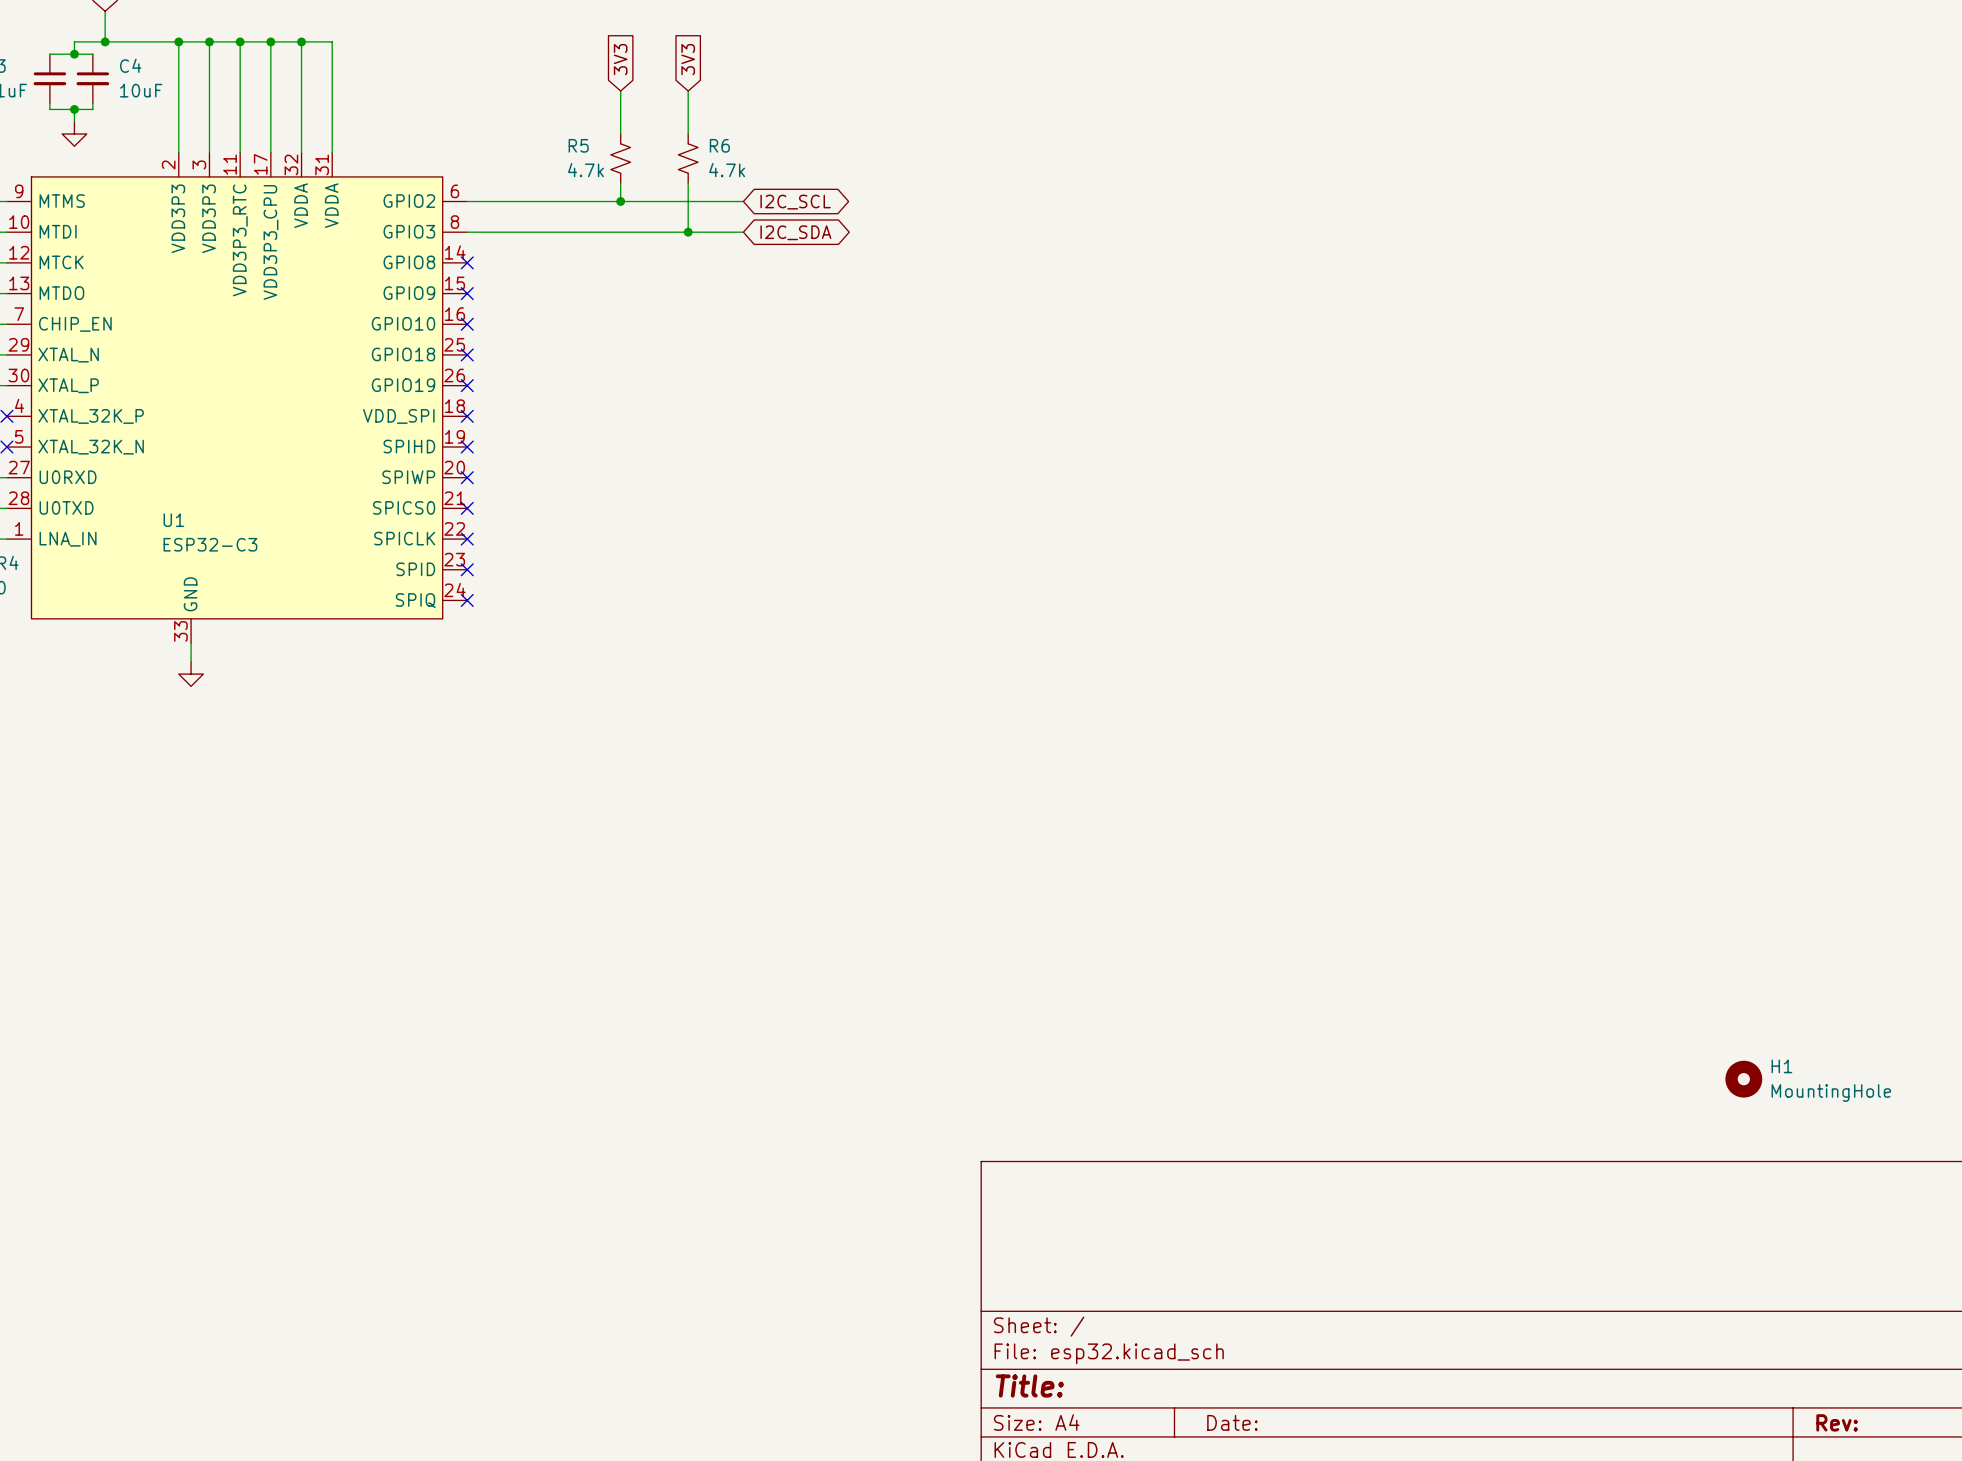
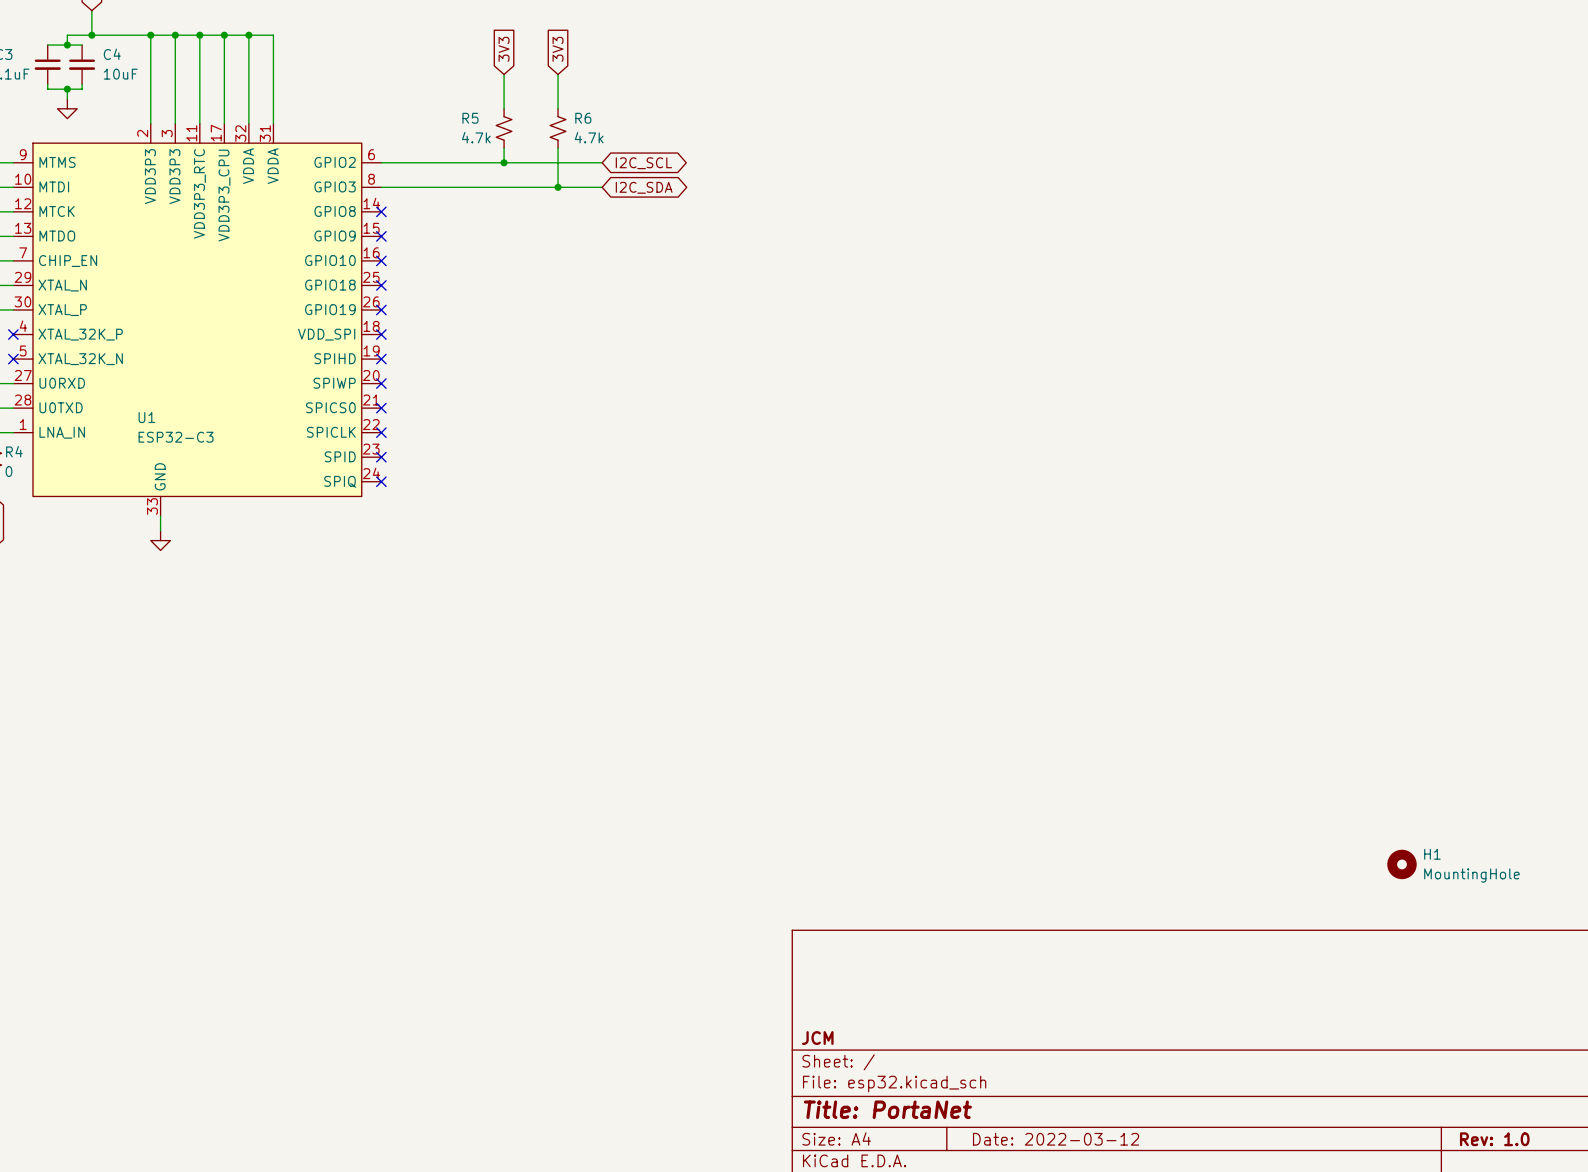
title block: none -> JCM (817, 1038)
title block: Title: (1029, 1385) -> Title: PortaNet (887, 1109)
title block: Date: (1232, 1422) -> Date: 2022-03-12 (1056, 1139)
title block: Rev: (1837, 1422) -> Rev: 1.0 (1494, 1139)

